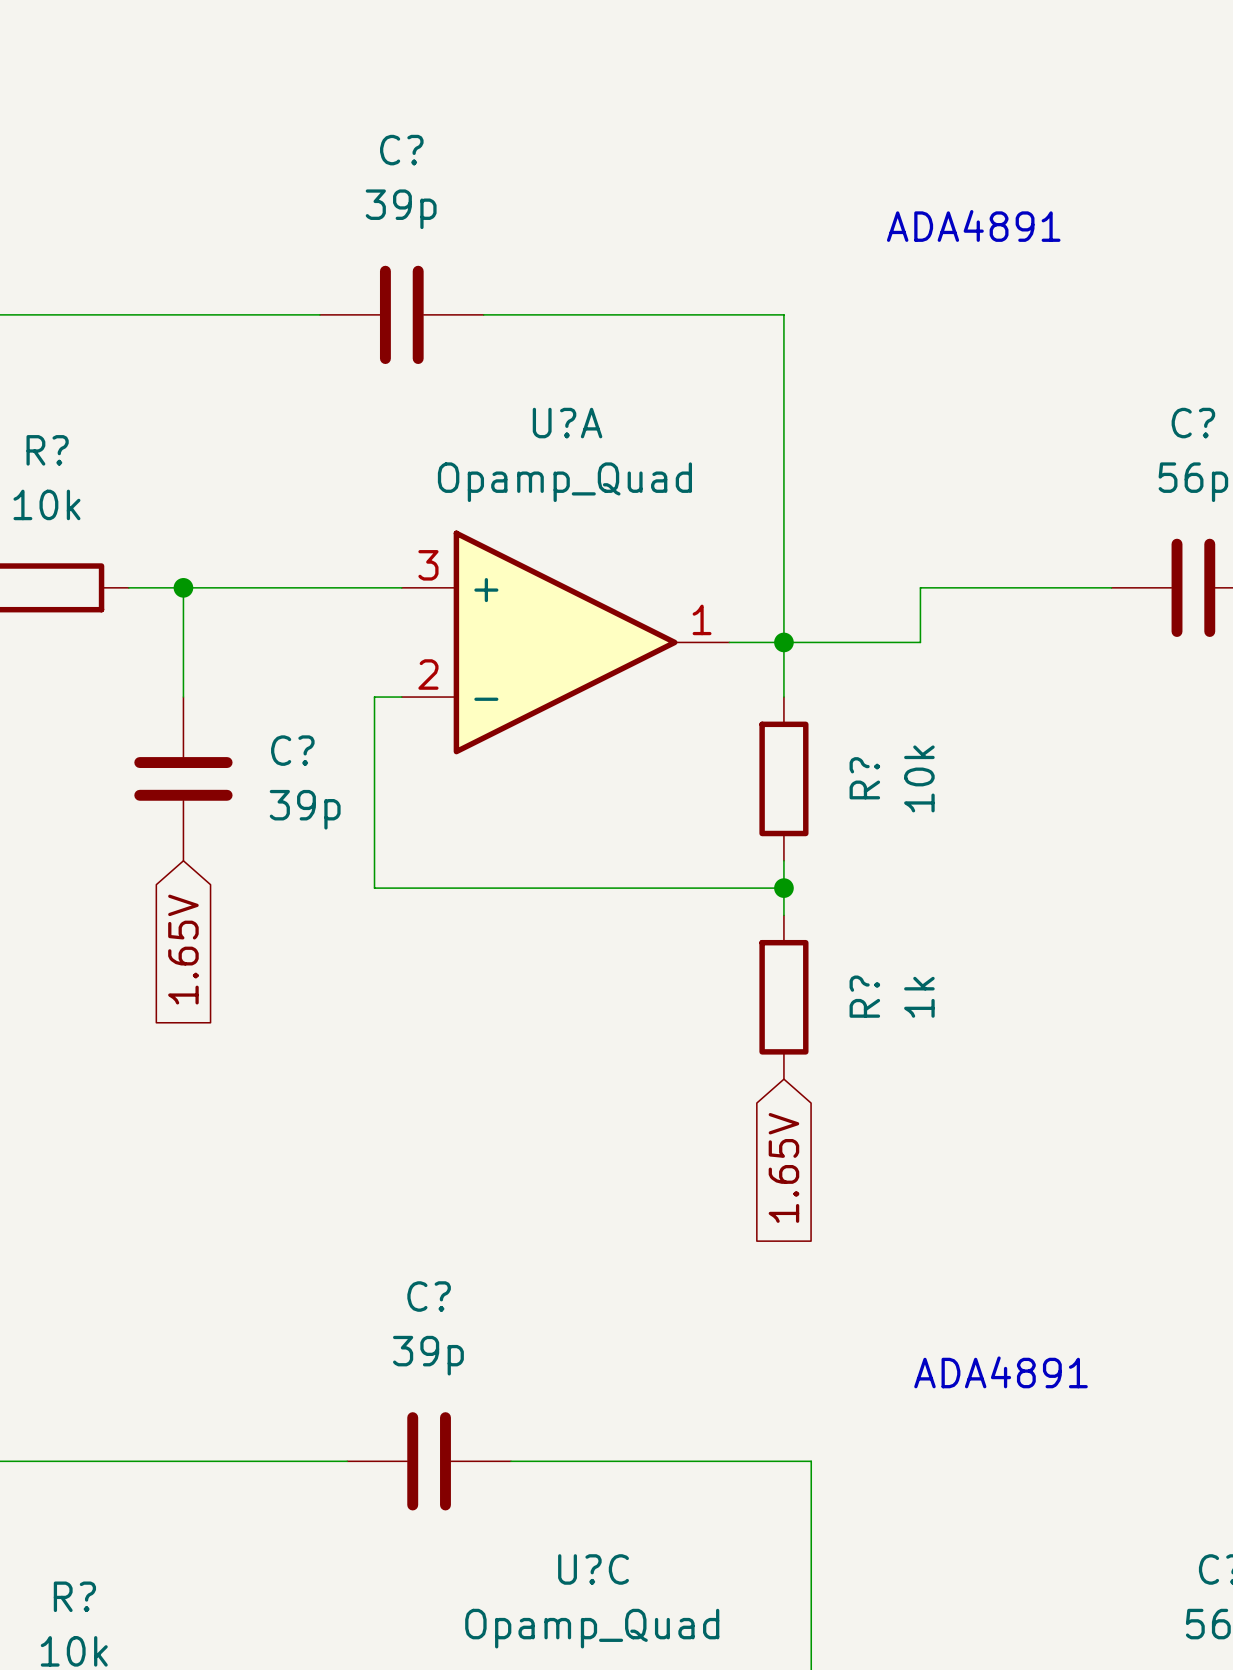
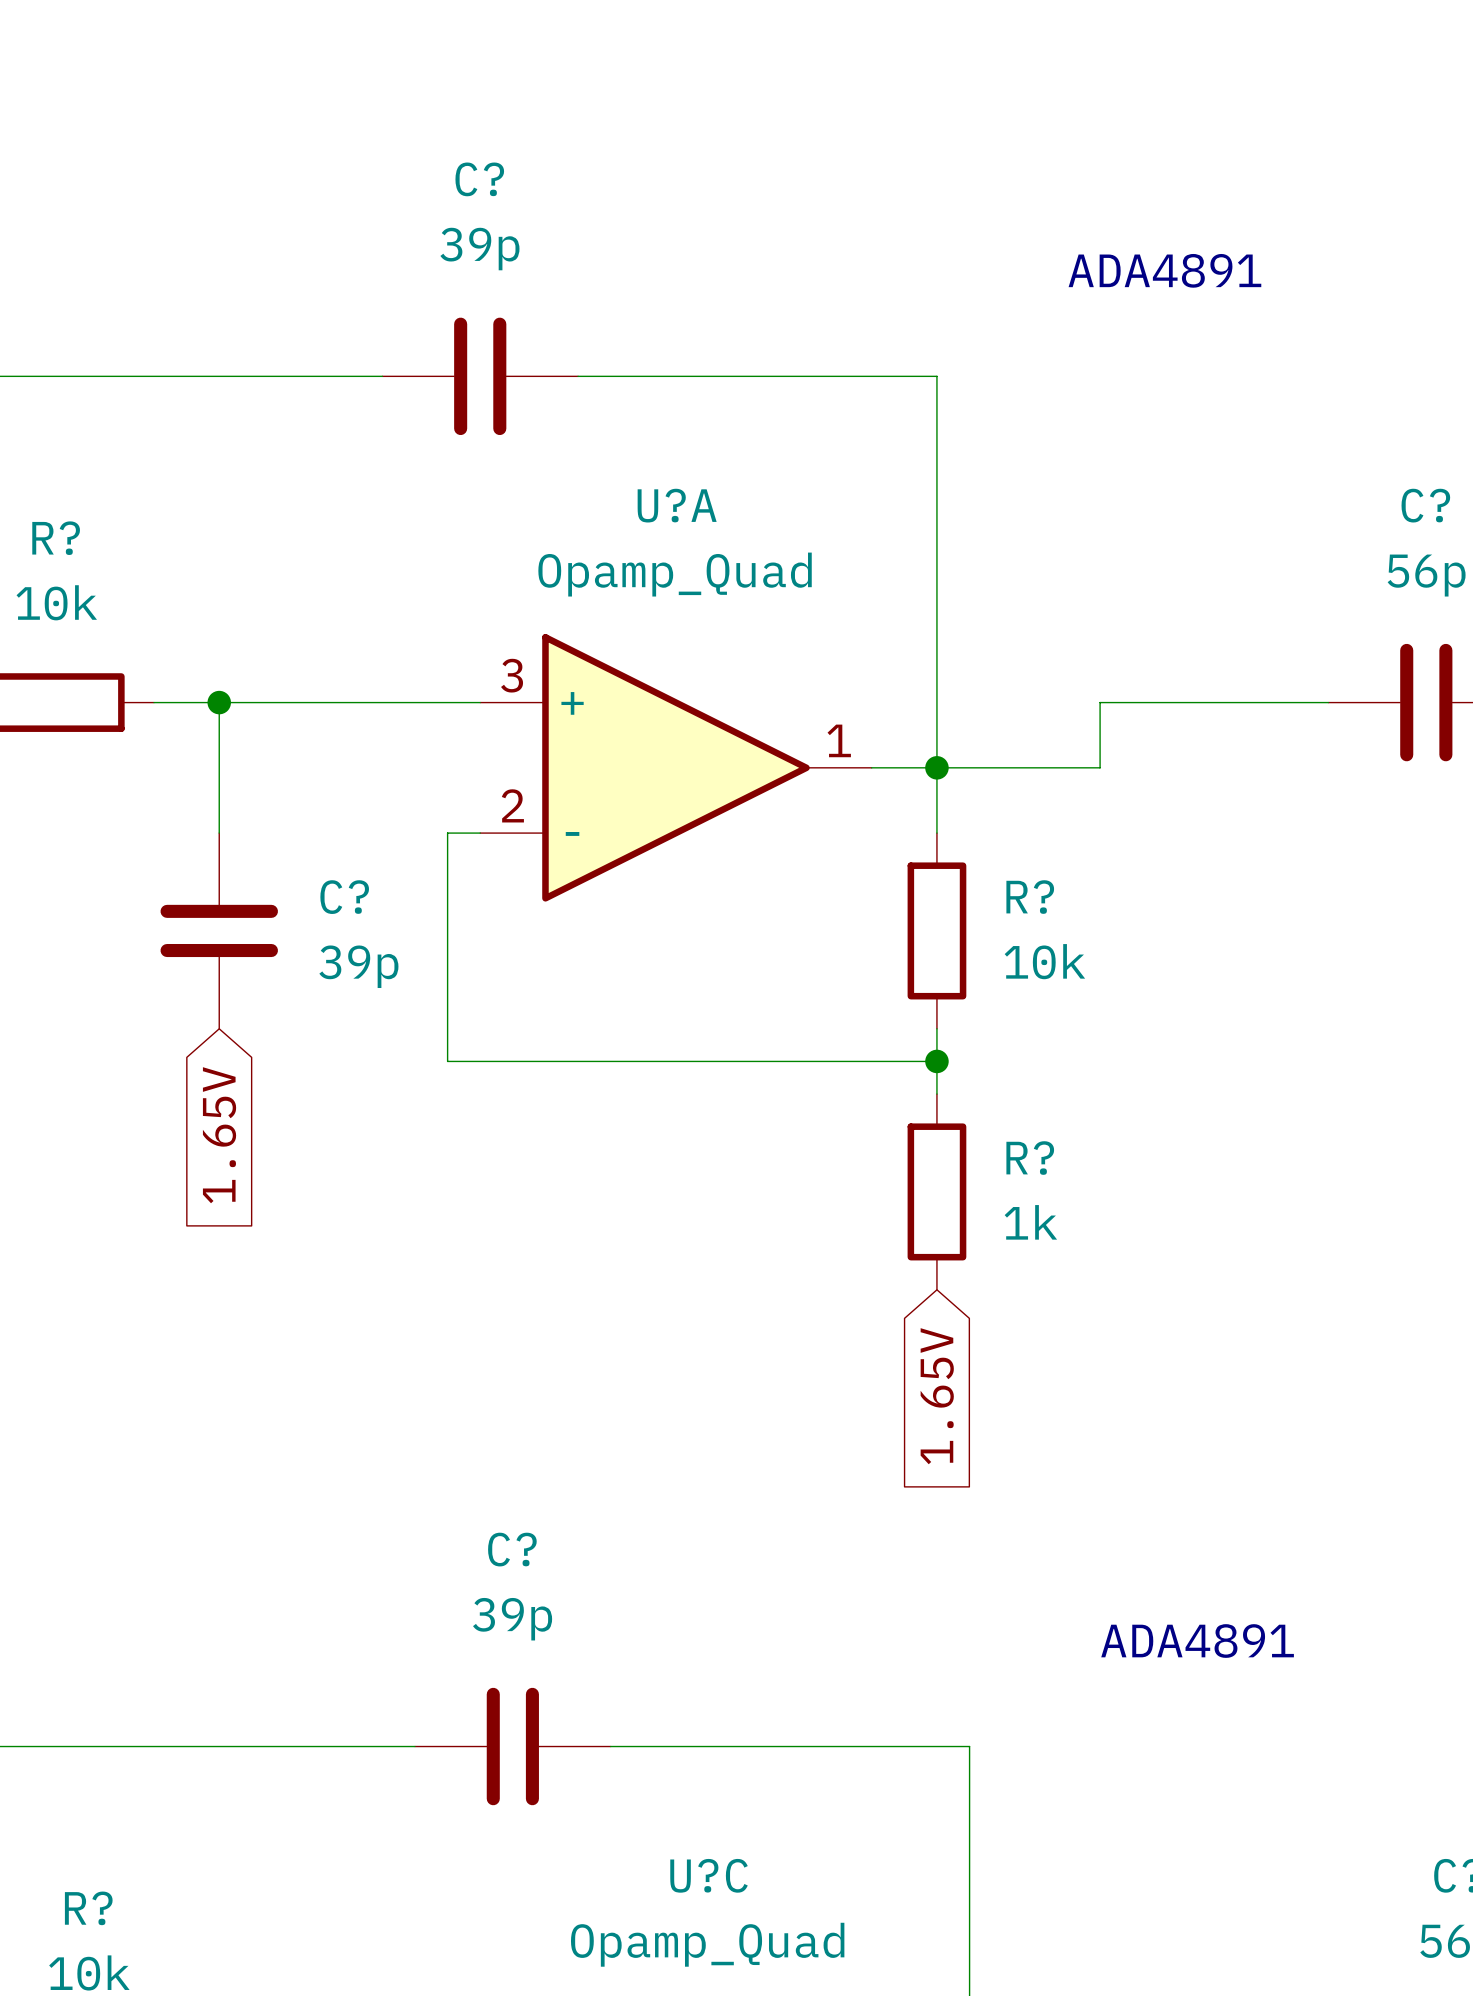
R? name rotation: 0° (864, 778) -> 90° clockwise (1030, 897)
R? value rotation: 0° (919, 778) -> 90° clockwise (1044, 961)
R? name rotation: 0° (864, 996) -> 90° clockwise (1030, 1158)
R? value rotation: 0° (919, 997) -> 90° clockwise (1030, 1222)

